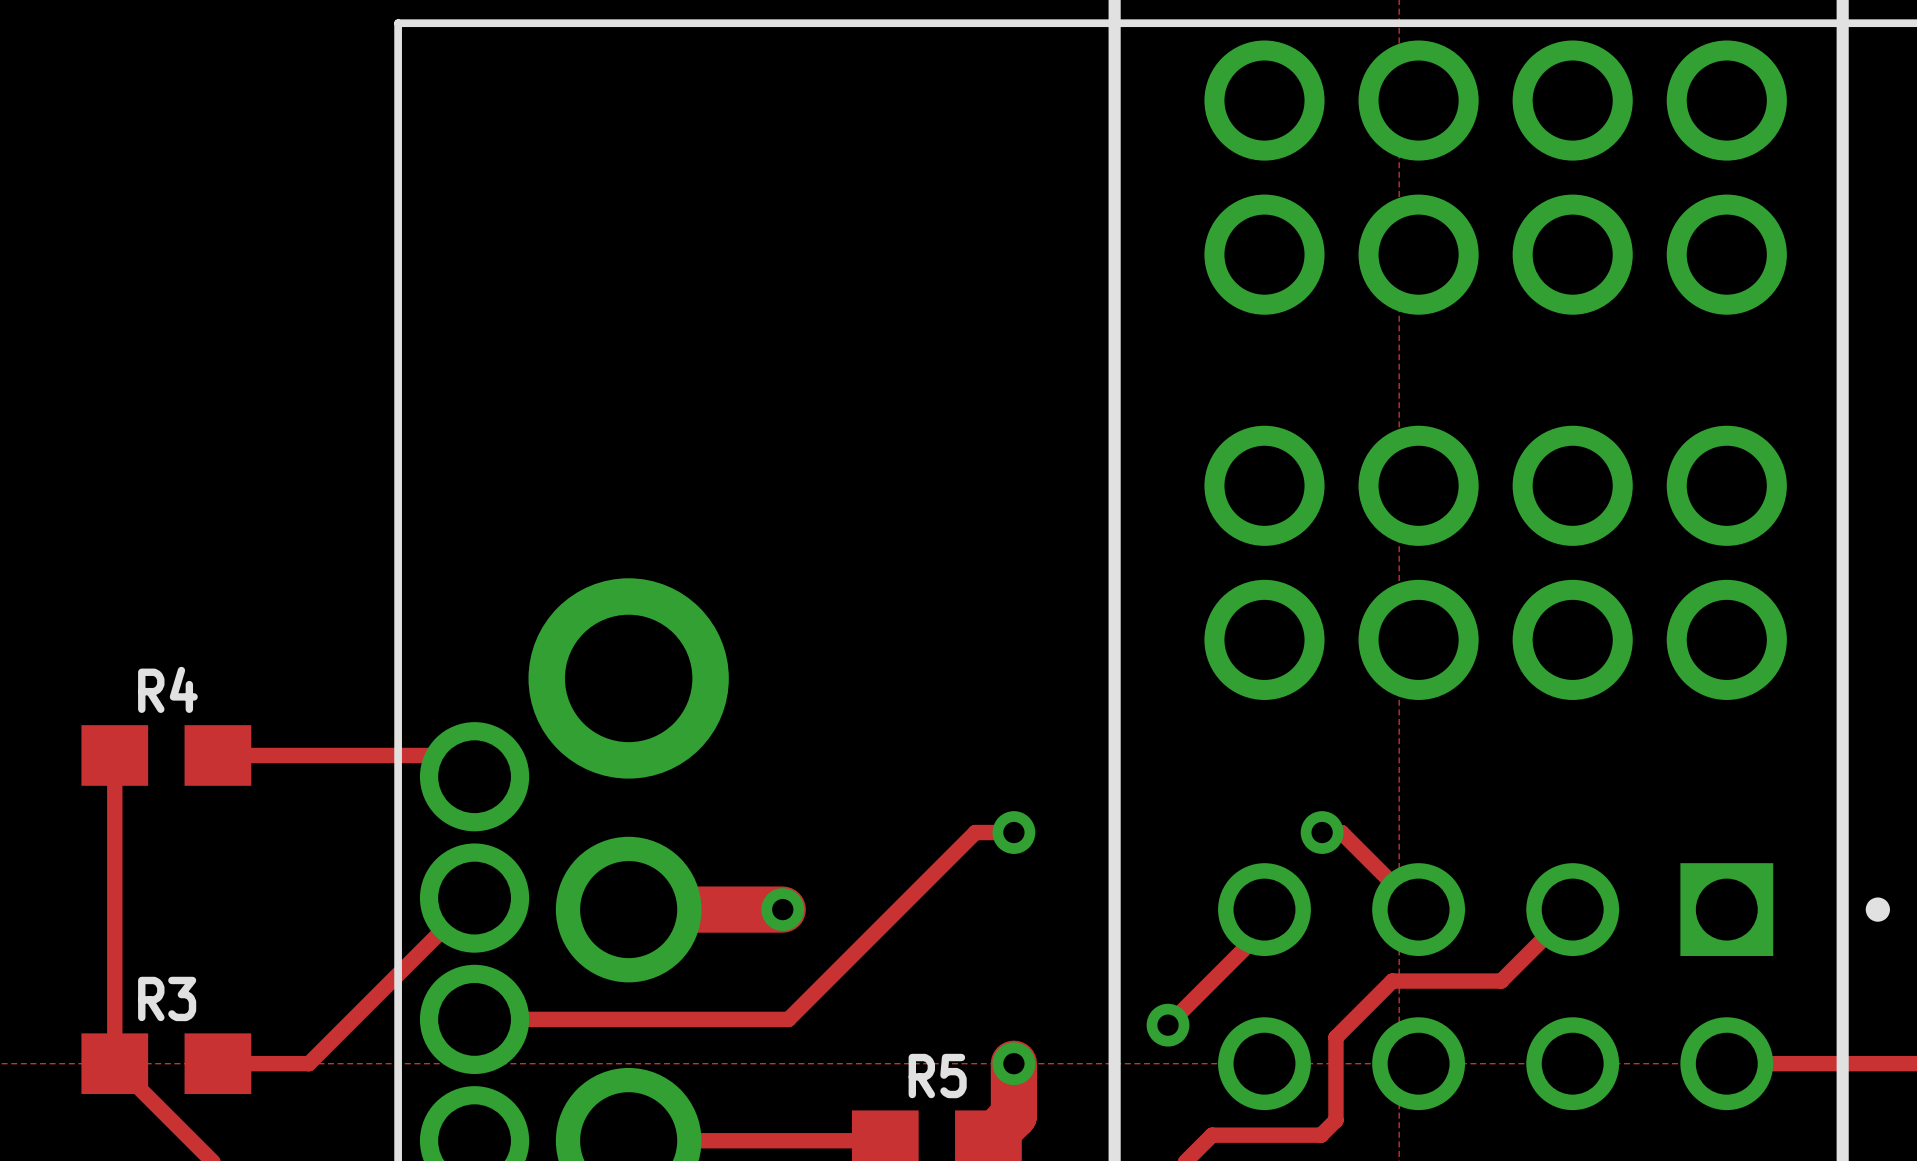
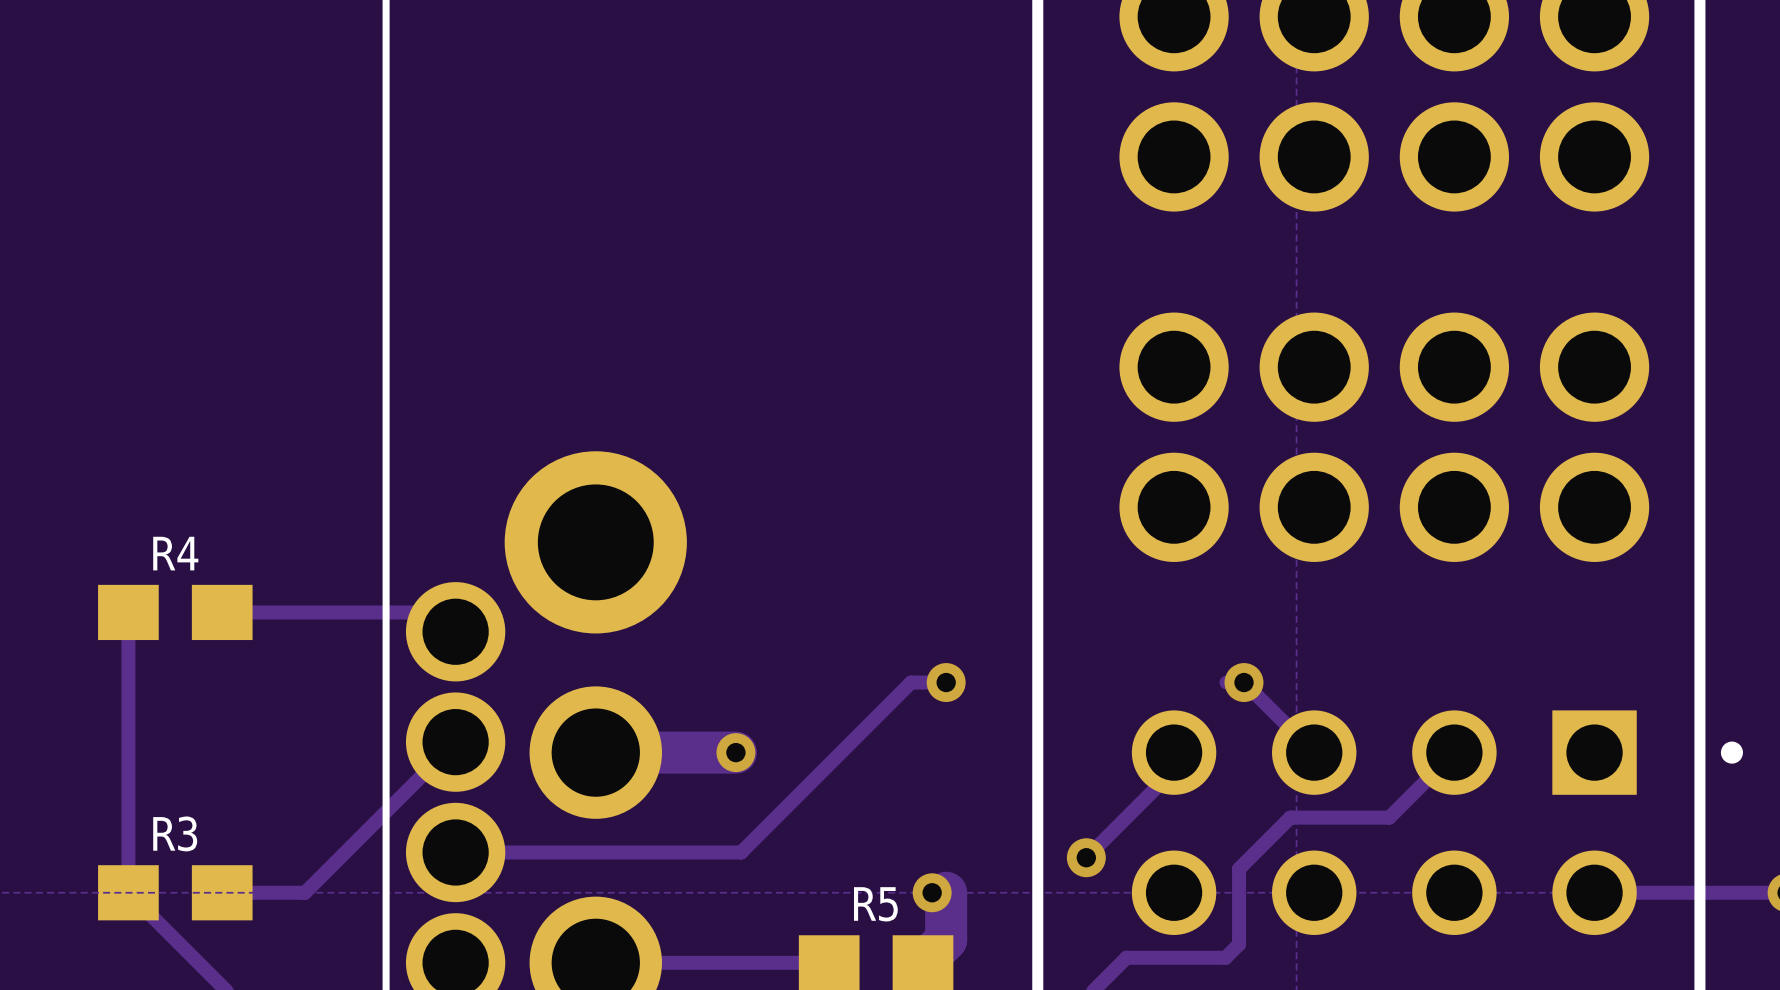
via position: (1322, 832) -> (1244, 682)
via position: (1013, 1063) -> (932, 892)

